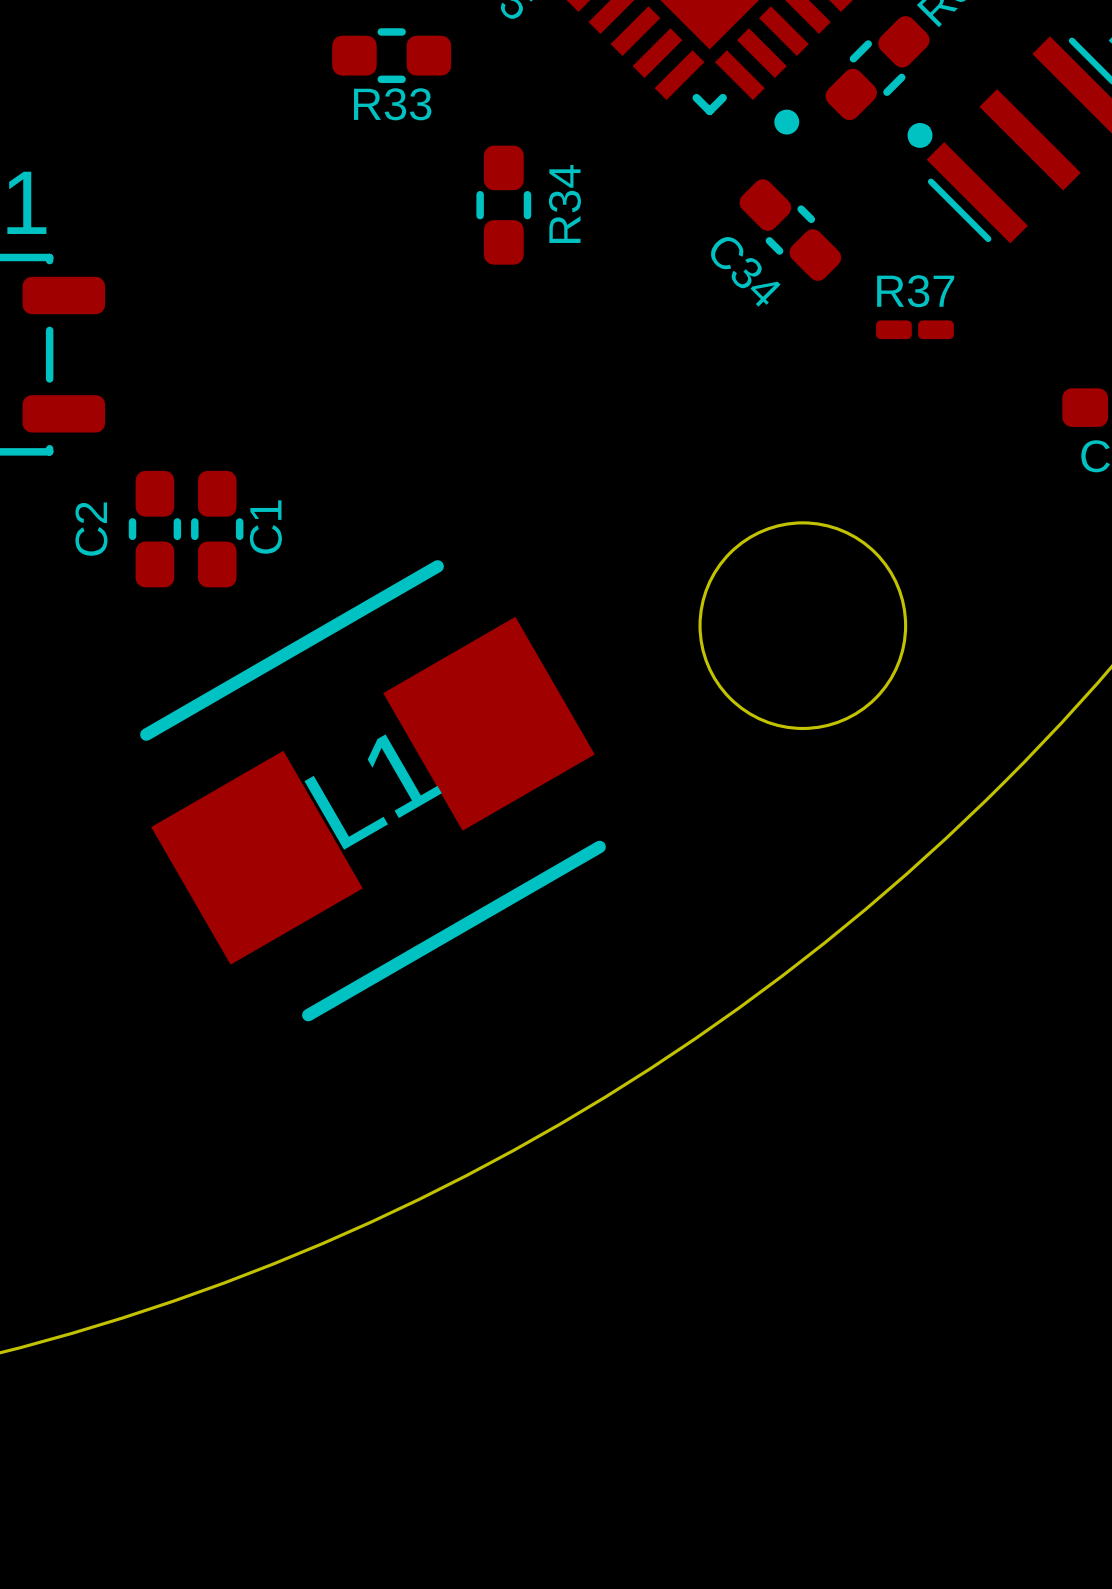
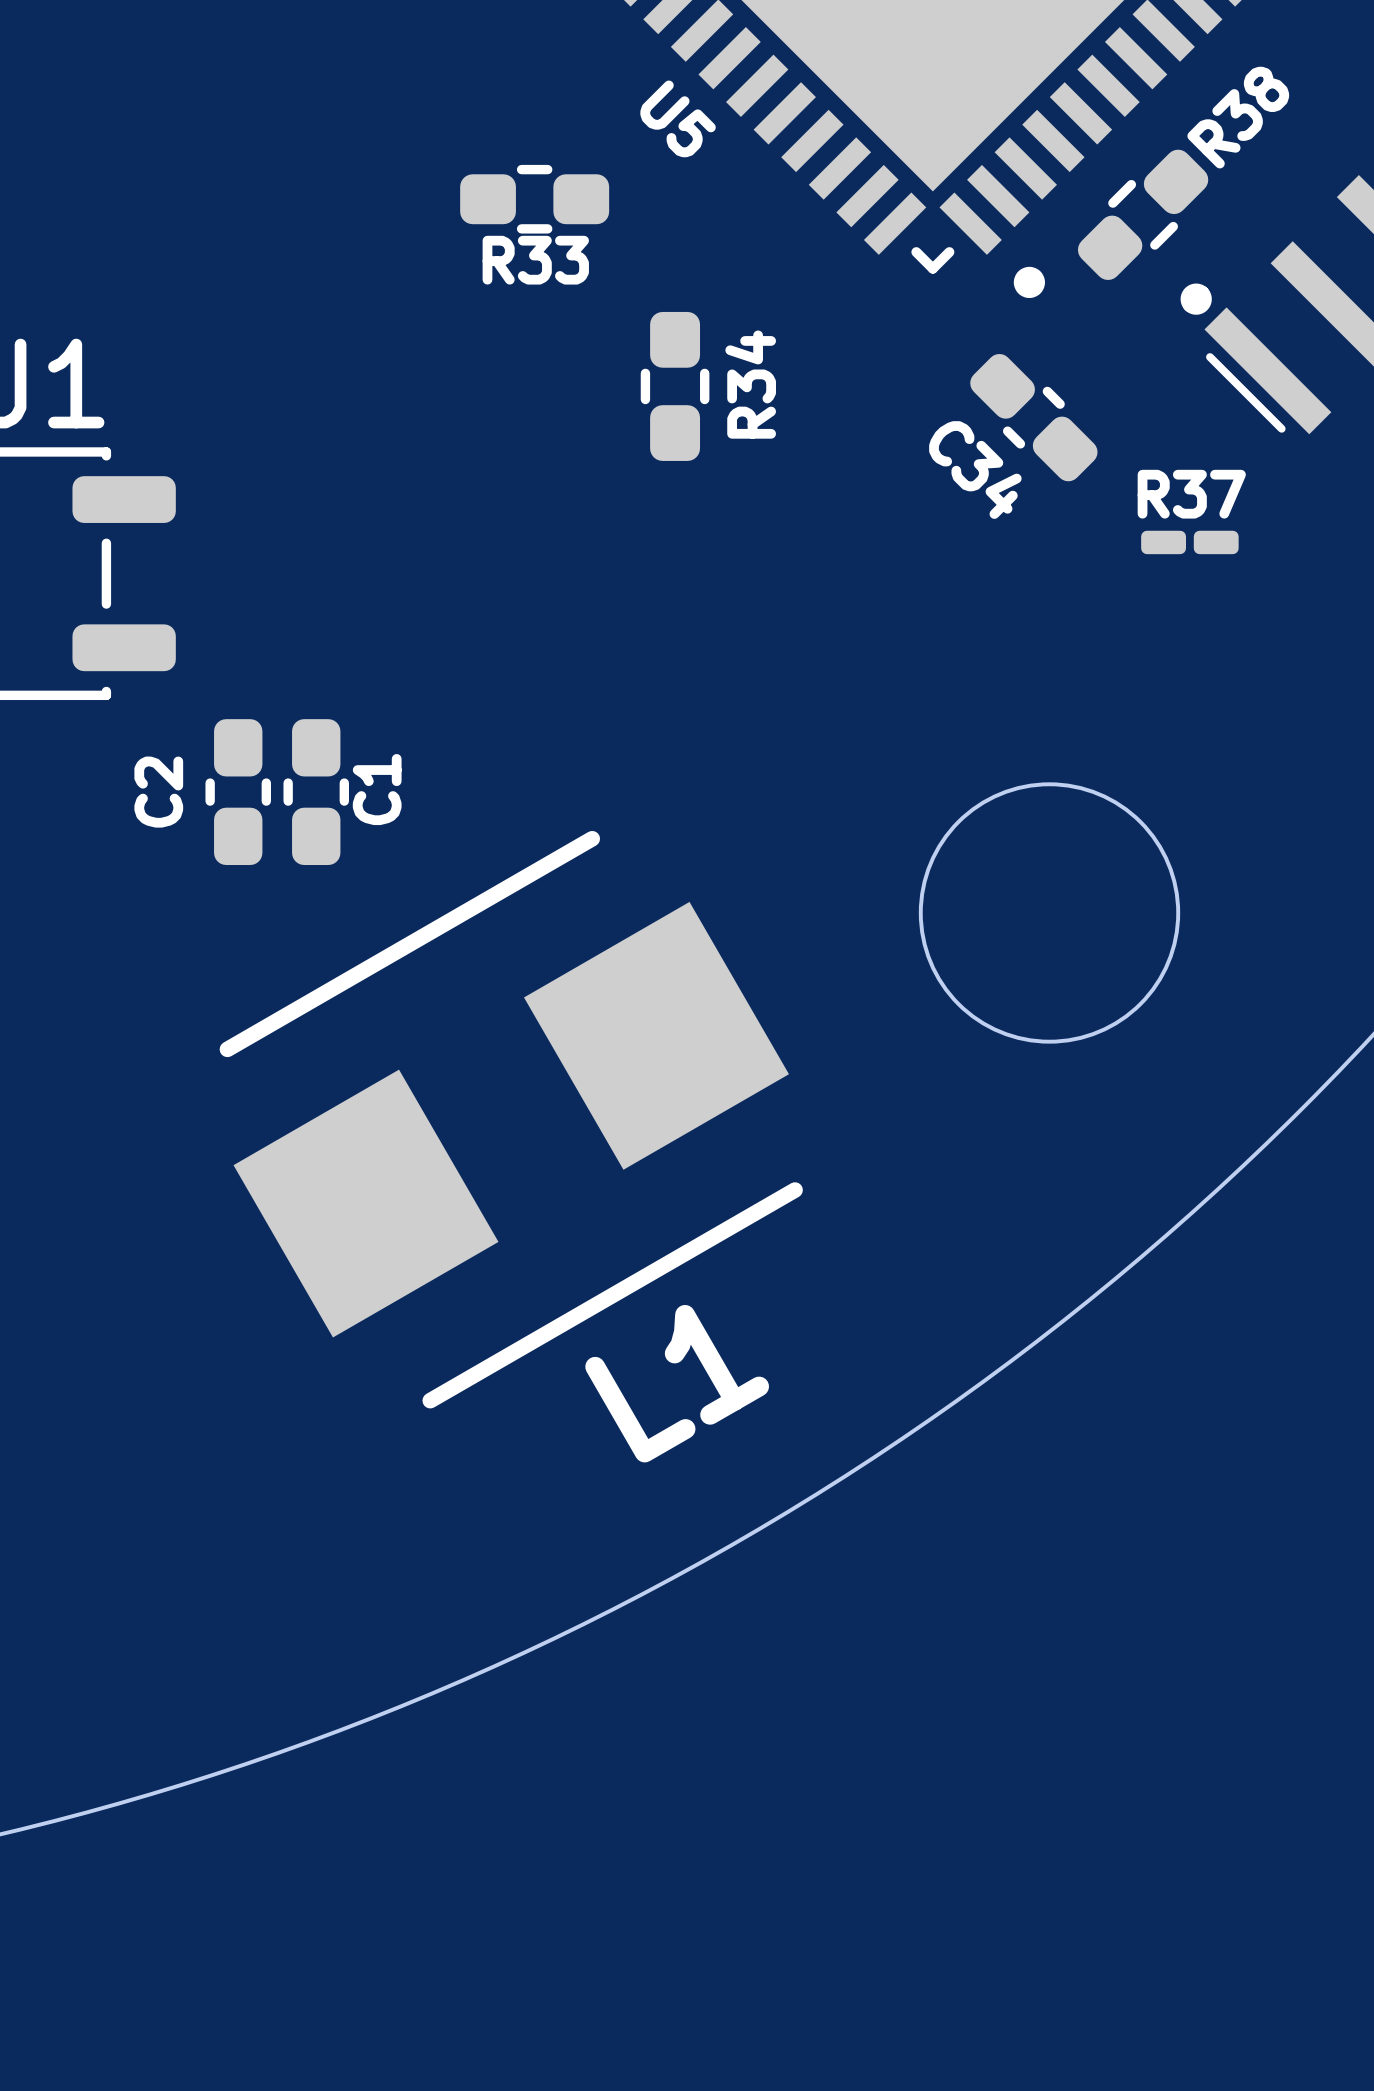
L1 name position: L1 (373, 792) -> L1 (677, 1383)

